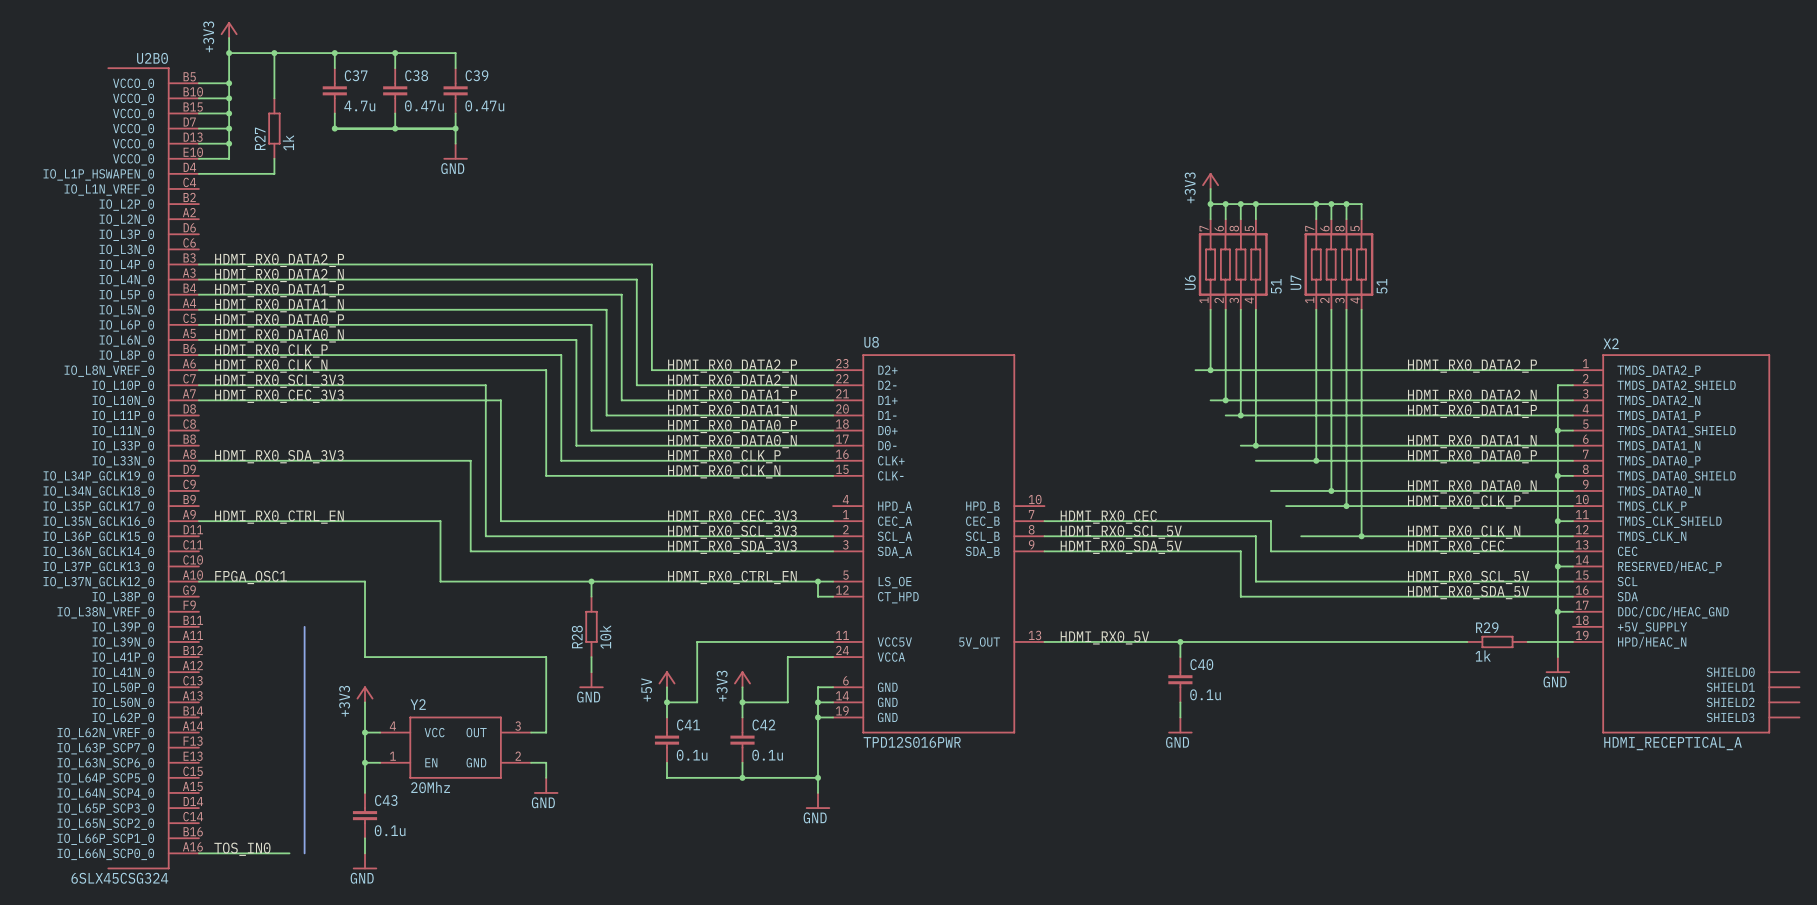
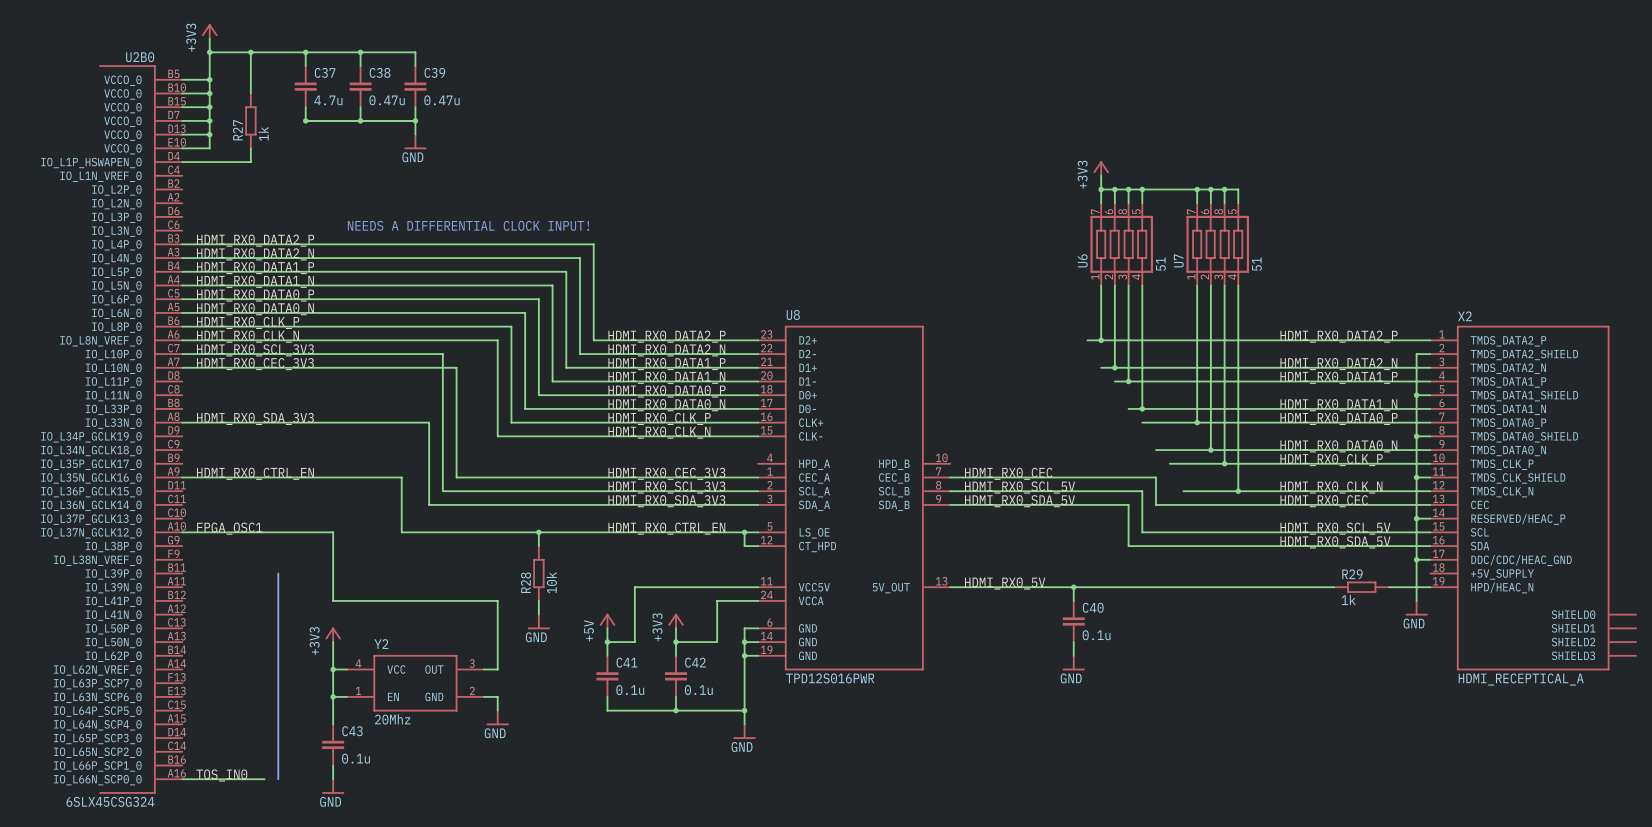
text: none -> NEEDS A DIFFERENTIAL CLOCK INPUT! (468, 225)

